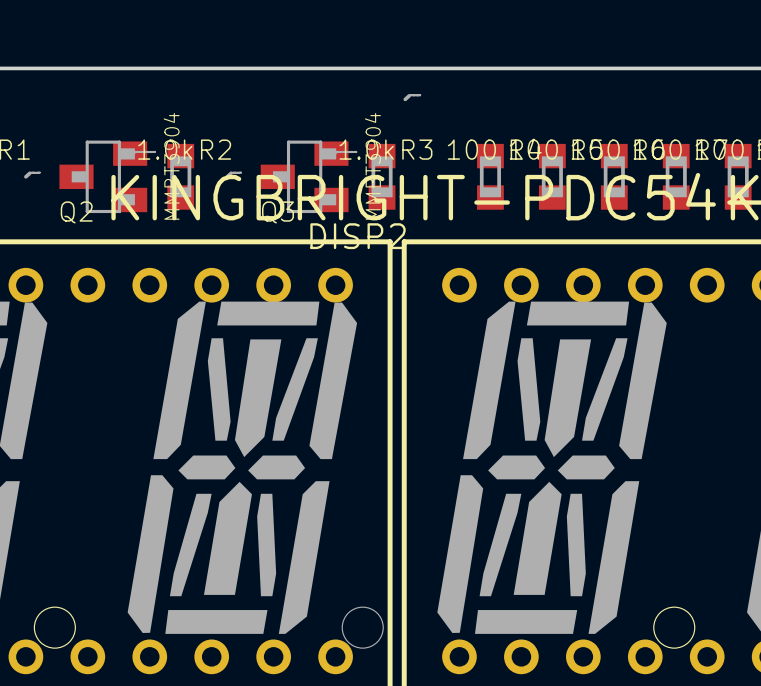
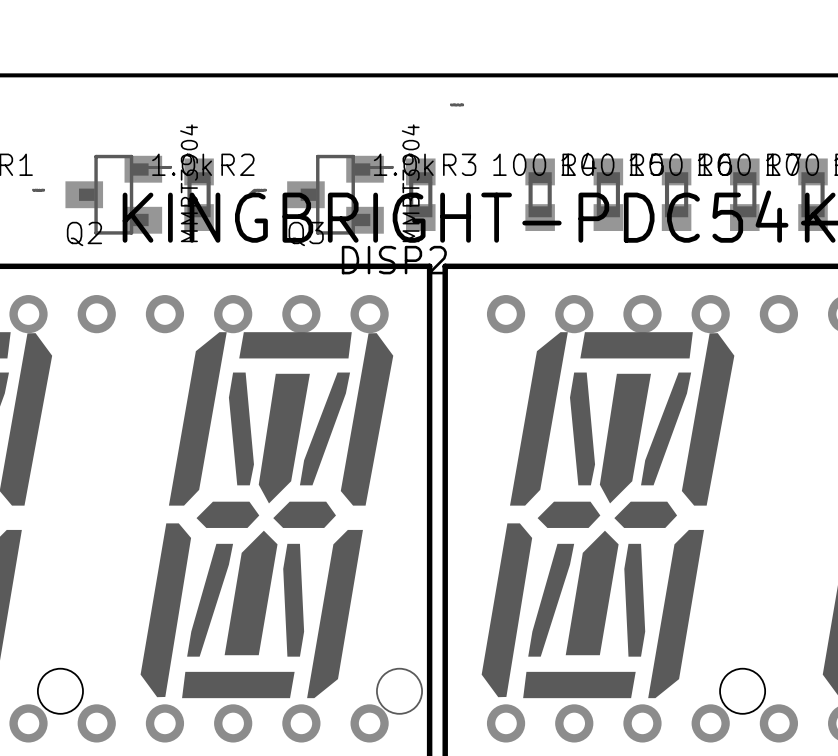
line: (409, 95) (405, 99) -> none
line: (29, 173) (25, 176) -> none

